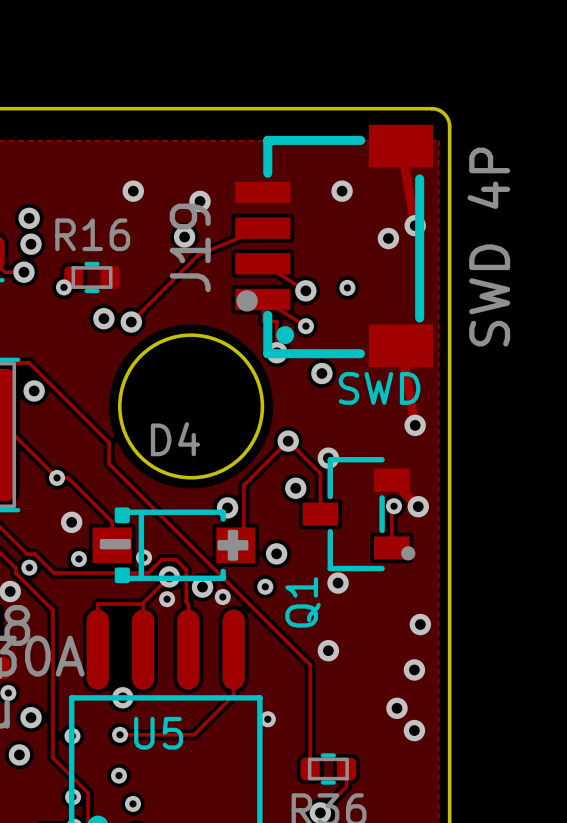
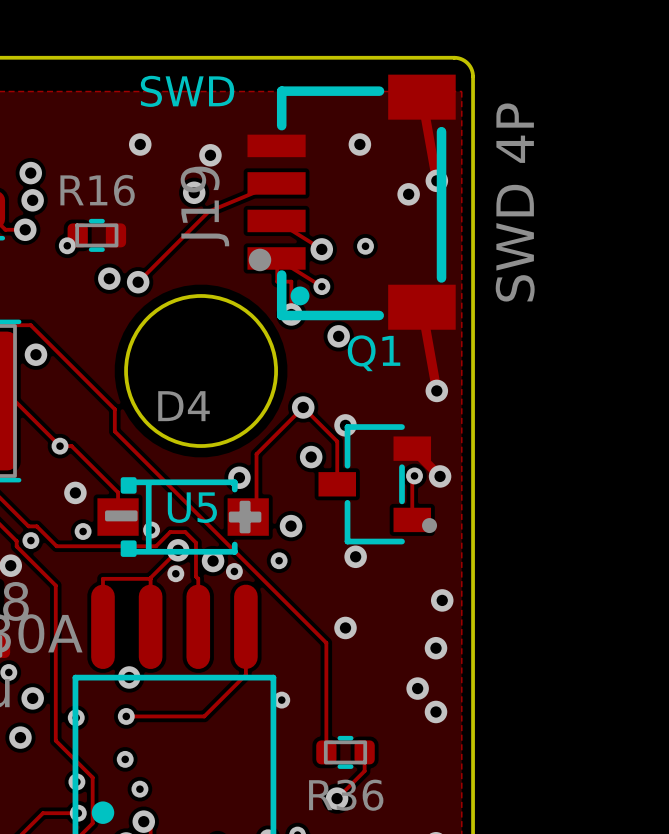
text position: SWD (379, 388) -> SWD (187, 91)
Q1 name rotation: 0° (303, 602) -> 90° clockwise (374, 353)
Q1 name position: Q1 (303, 602) -> Q1 (374, 353)
U5 name position: U5 (158, 733) -> U5 (192, 507)

